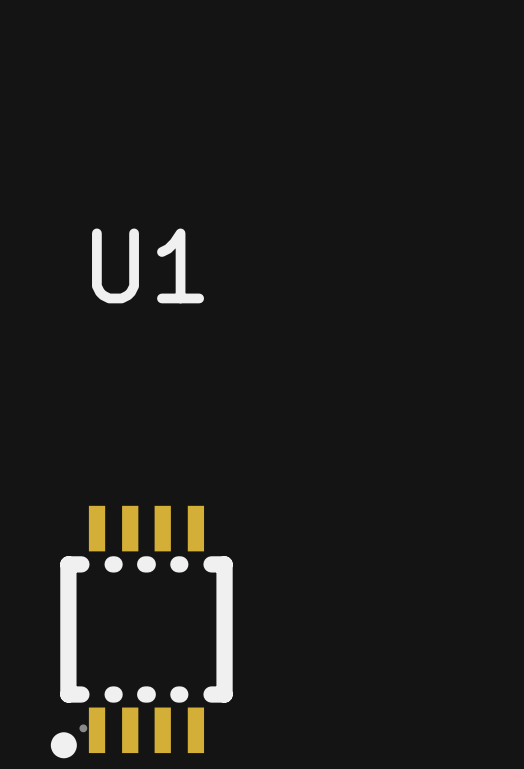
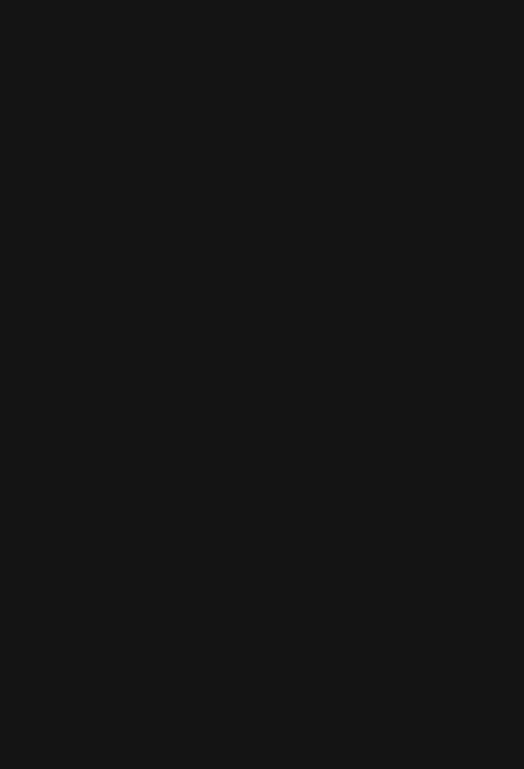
U1: (141, 632) -> none

